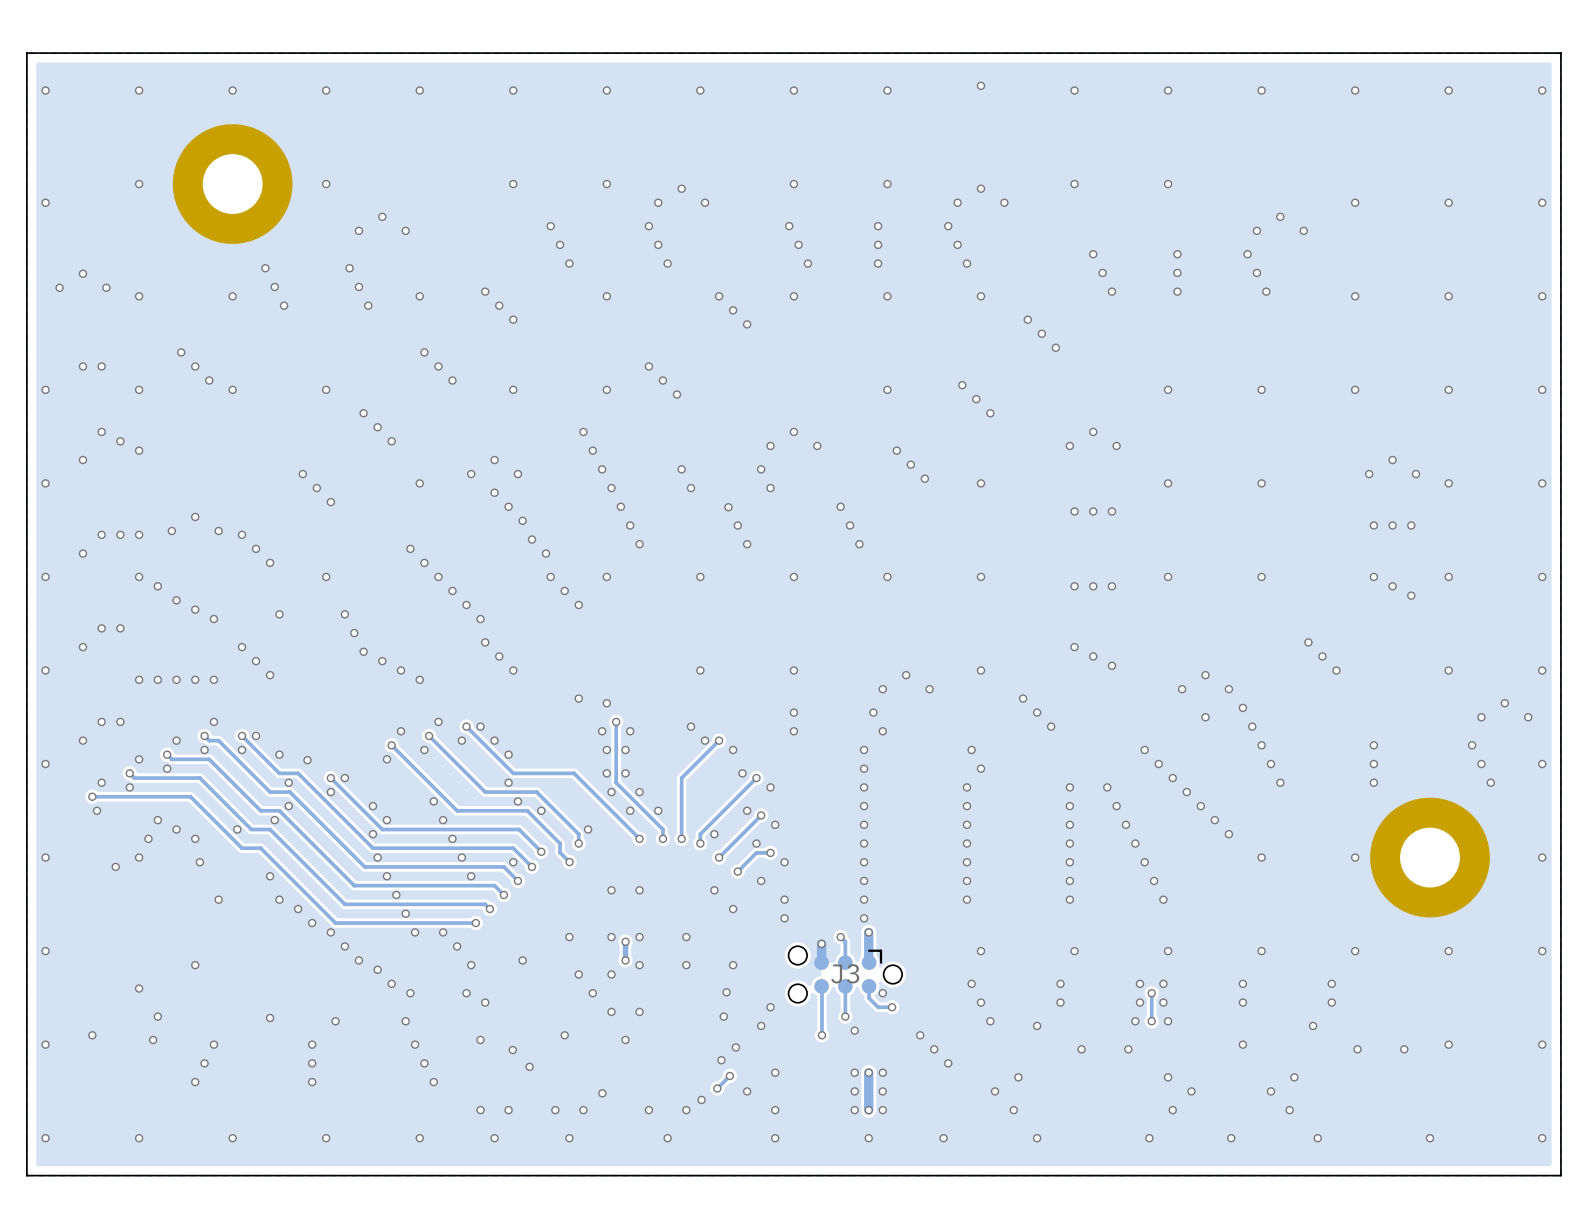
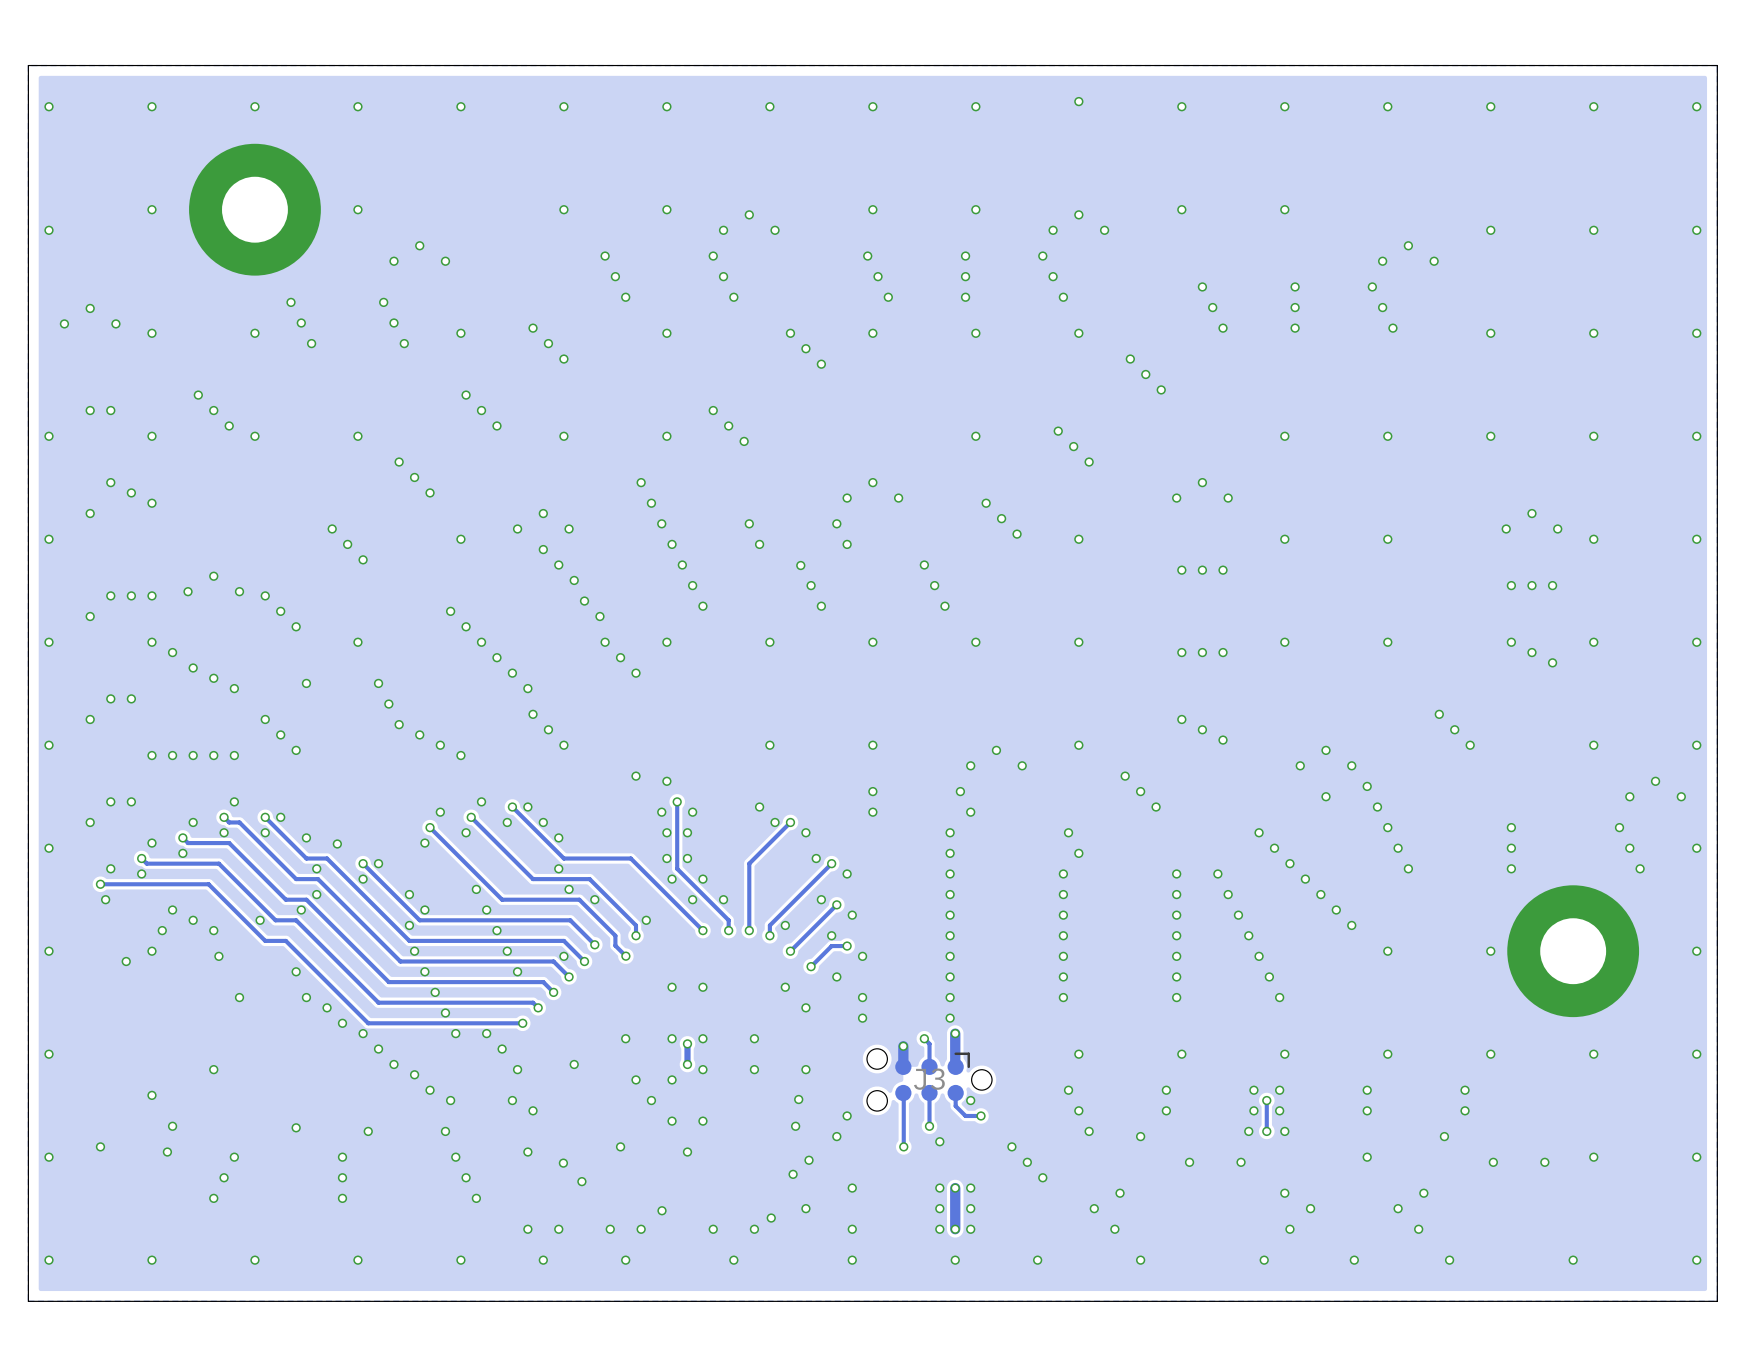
track: (729, 1075) (717, 1088) -> none
via: (729, 1075) -> none
via: (717, 1088) -> none
via: none -> (805, 1208)
via: (747, 1091) -> none

